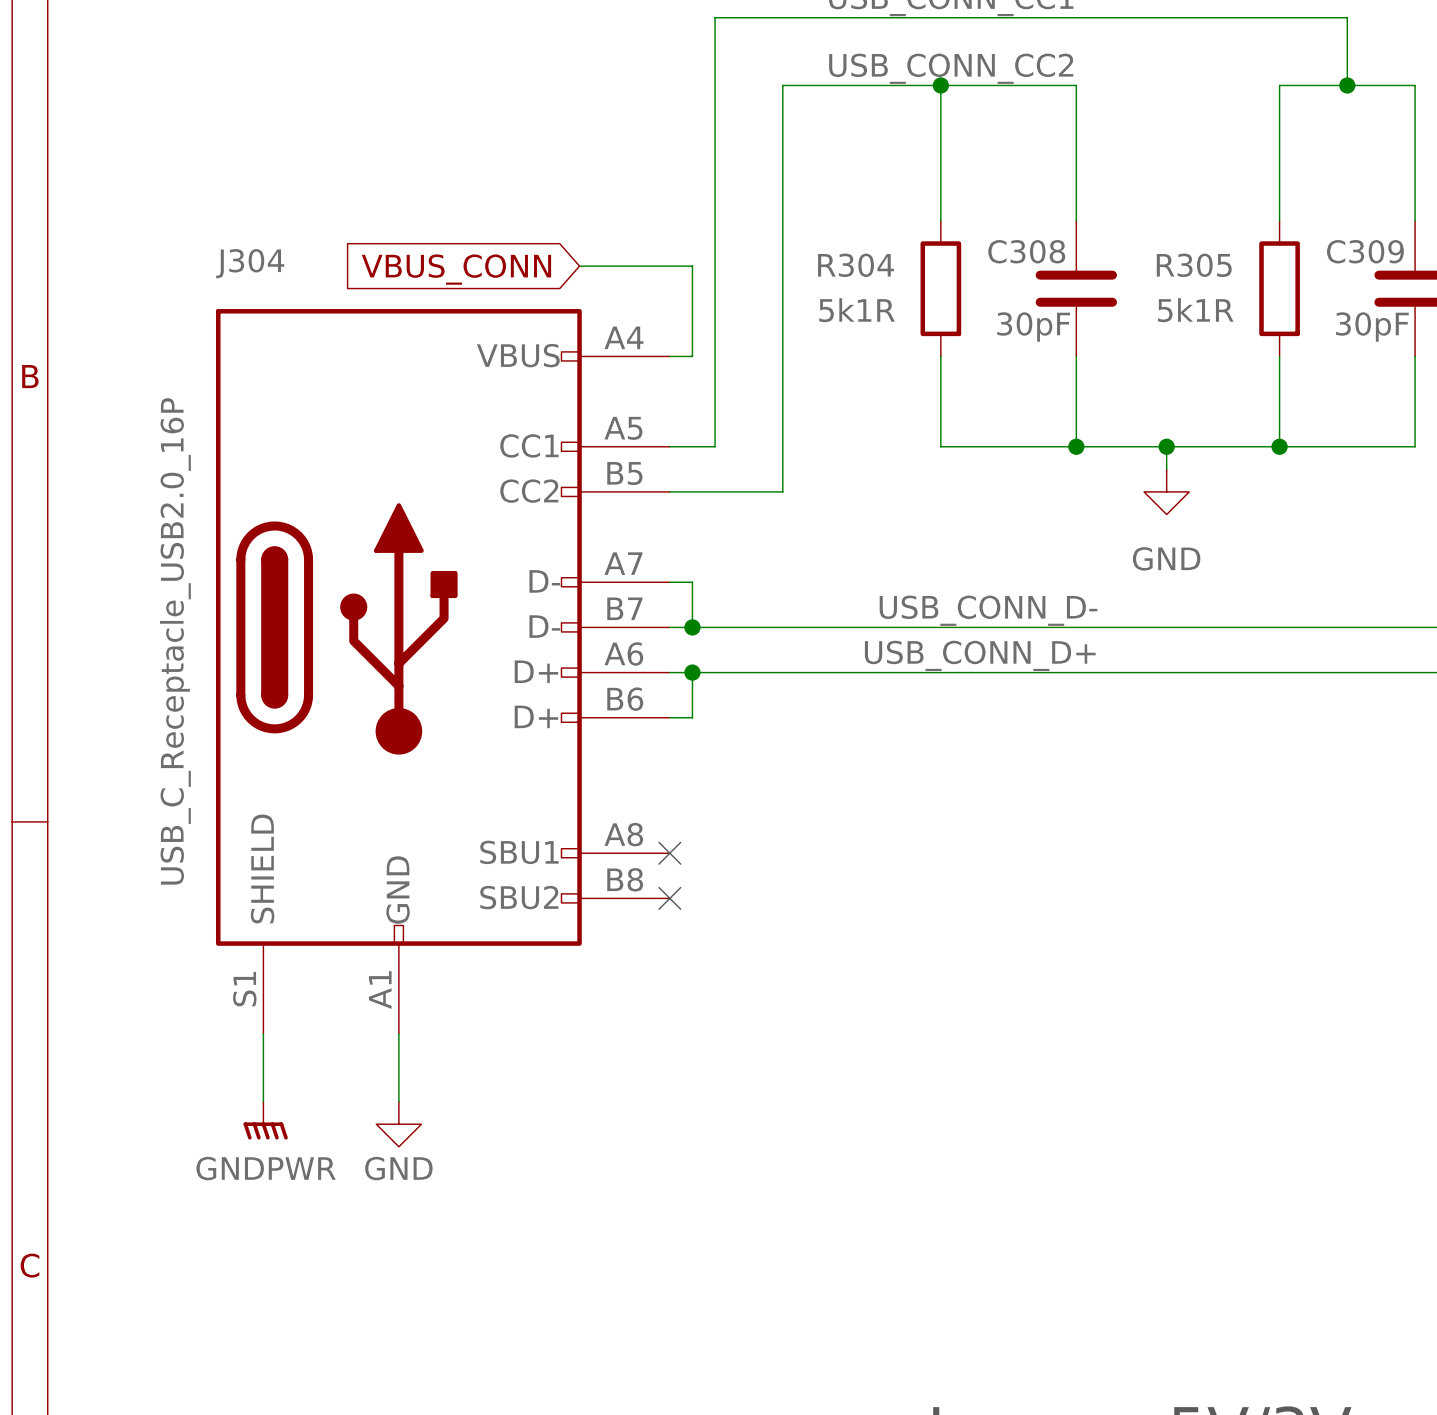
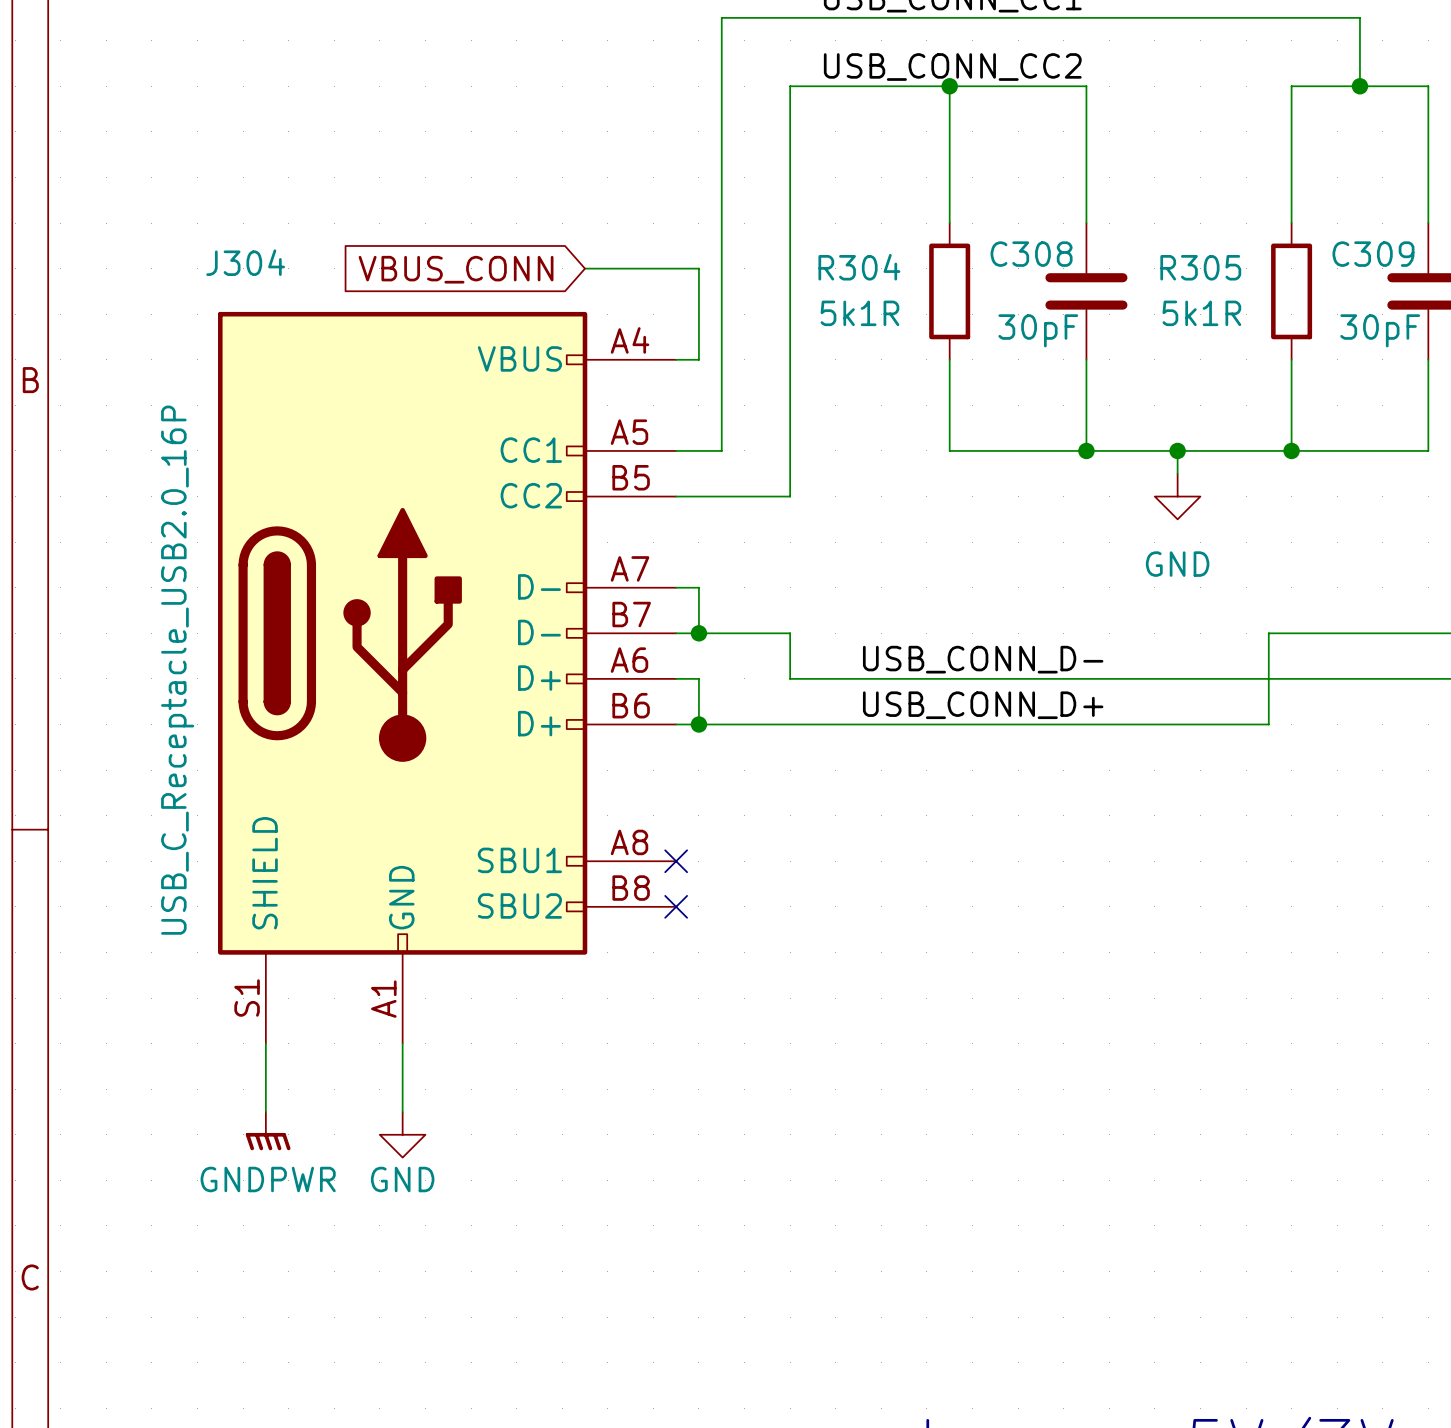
label: USB_CONN_D- (988, 610) -> none
wire: (782, 627) (1256, 627) -> (698, 724) (1268, 724) (1268, 633)
label: USB_CONN_D+ (980, 655) -> USB_CONN_D- (983, 659)
wire: (692, 672) (782, 672) -> (790, 633) (790, 678)
junction position: (692, 672) -> (698, 724)
label: none -> USB_CONN_D+ (983, 705)

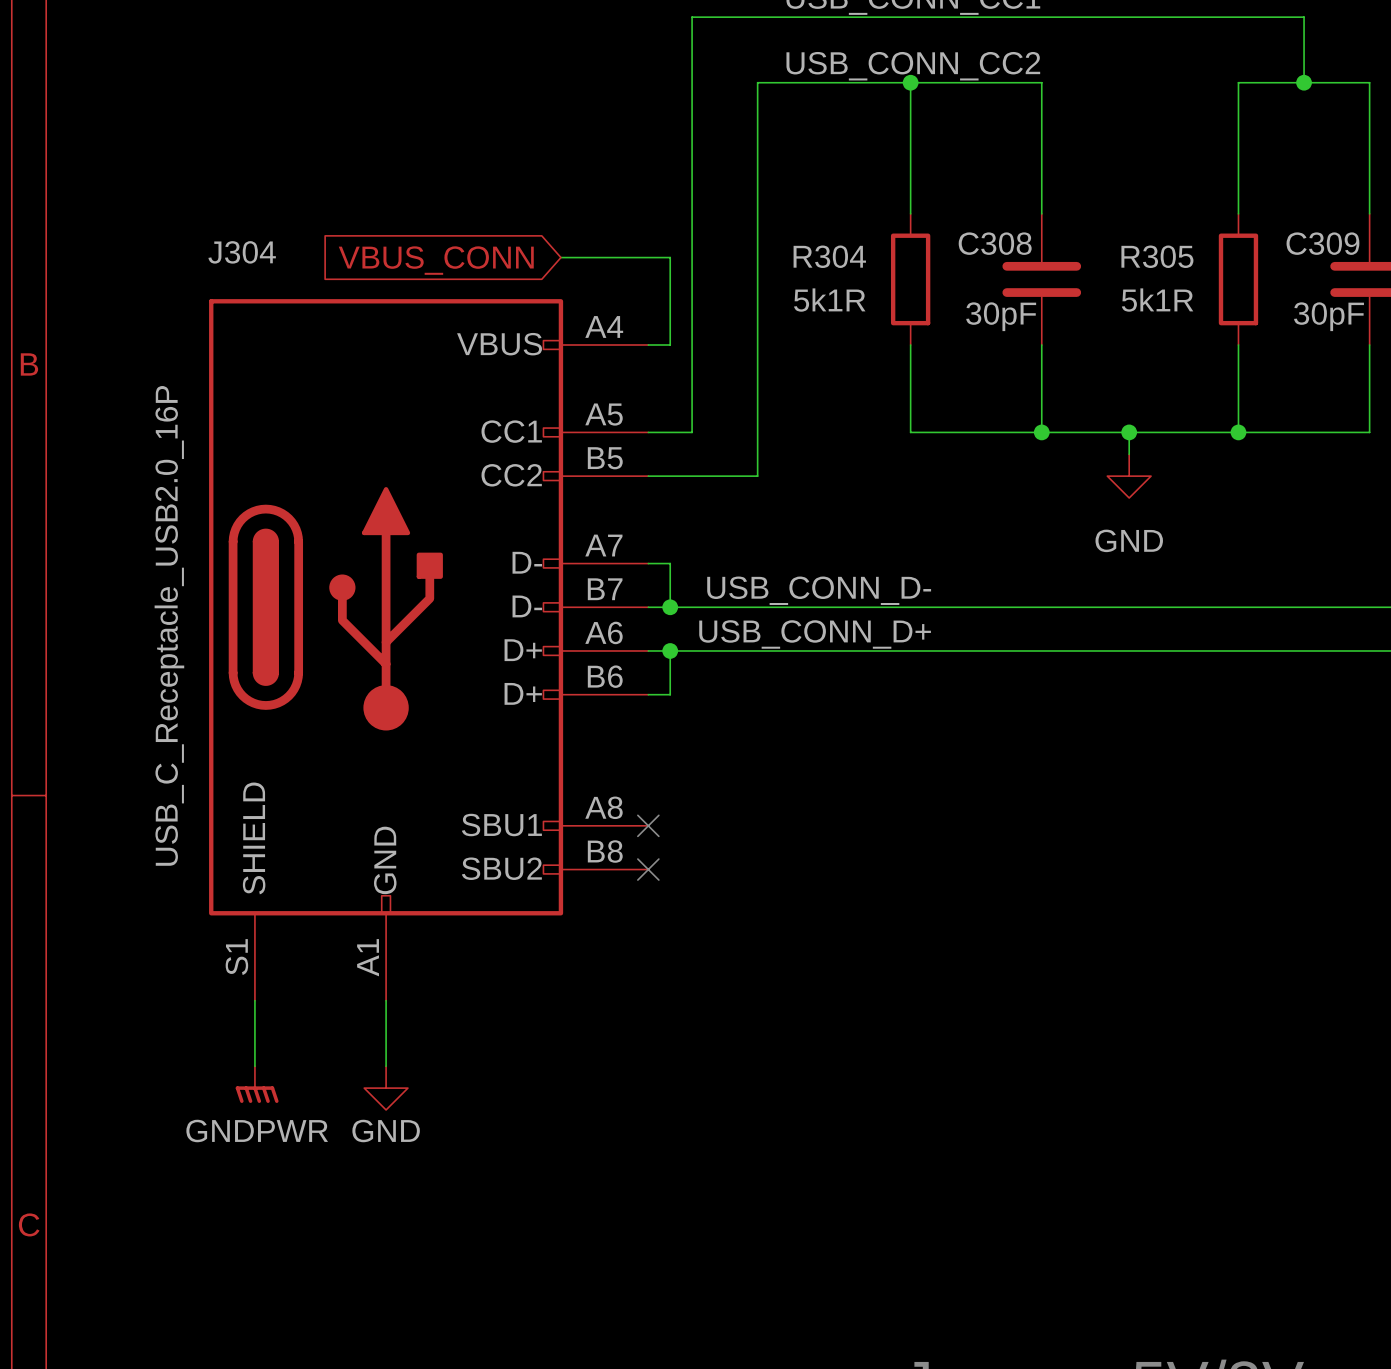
wire: (790, 633) (790, 678) -> (670, 650) (757, 650)
wire: (1268, 633) (1268, 724) (698, 724) -> (1216, 607) (757, 607)
label position: USB_CONN_D- (983, 659) -> USB_CONN_D- (819, 590)
label position: USB_CONN_D+ (983, 705) -> USB_CONN_D+ (815, 634)
junction position: (698, 724) -> (670, 650)

